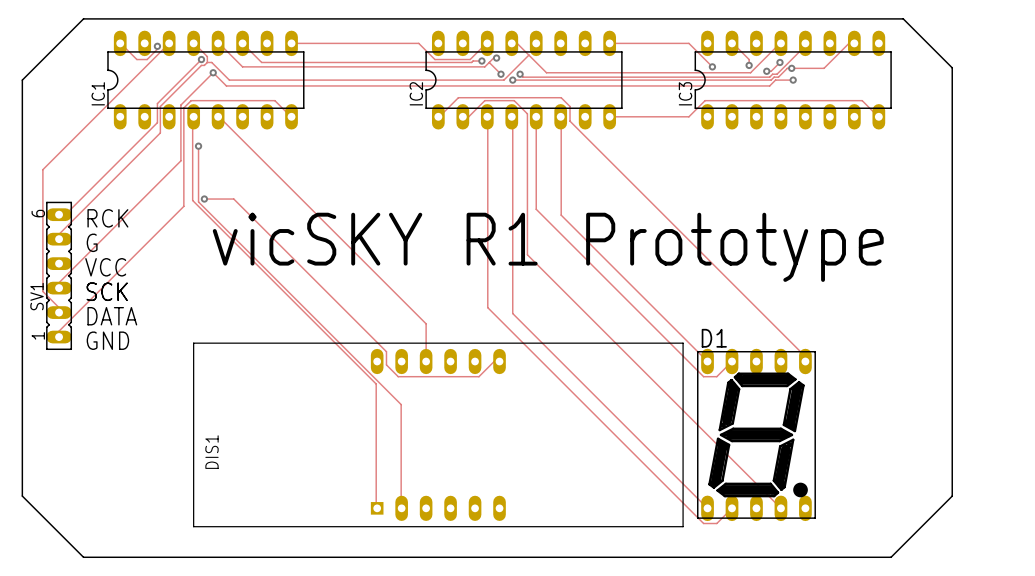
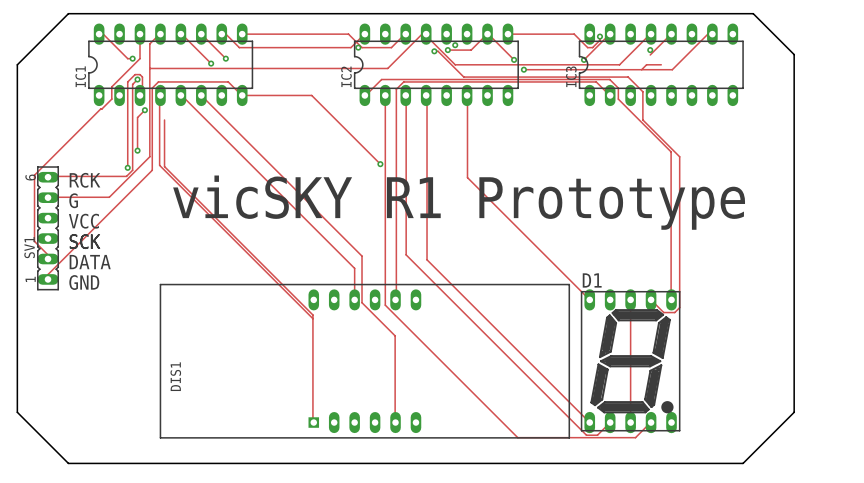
track: (120, 43) (136, 59) (147, 59) (157, 49) (157, 46) -> (99, 34) (103, 34) (127, 58) (132, 58)
track: (169, 43) (42, 169) (42, 212) -> (140, 34) (140, 58) (111, 86) (111, 99) (34, 175)
track: (193, 43) (207, 56) (207, 62) -> (160, 34) (149, 43) (149, 85)
track: none -> (221, 34) (225, 34) (239, 47) (350, 47) (364, 34)
track: none -> (426, 34) (422, 34) (387, 68) (149, 68)
track: (512, 43) (517, 43) (546, 72) (750, 72) -> (619, 64) (625, 58)
track: (732, 43) (749, 59) (749, 65) -> (610, 34) (584, 59)
track: (804, 43) (804, 46) (777, 74) (772, 74) (769, 77) (523, 77) (520, 74) -> (671, 34) (650, 54)
via: (157, 46) -> none
via: none -> (599, 36)
track: (528, 55) (503, 80) (229, 80) (211, 62) (207, 62) -> none
via: none -> (455, 45)
track: (496, 58) (493, 58) (484, 66) (242, 66) -> (211, 63) (201, 53)
via: (496, 58) -> none
track: (201, 59) (157, 103) (157, 122) (66, 213) -> none
via: (201, 59) -> none
via: none -> (358, 47)
track: (705, 59) (712, 66) -> (587, 47) (592, 47) (599, 40) (599, 36)
track: (481, 61) (261, 62) -> (225, 58) (217, 50)
via: (481, 61) -> none
track: (207, 62) (201, 65) (160, 106) -> (137, 79) (132, 86)
track: (489, 62) (501, 74) -> none
track: none -> (447, 50) (471, 50) (488, 34) (514, 59)
via: none -> (447, 50)
track: (779, 62) (771, 71) (766, 71) -> none
track: none -> (434, 51) (438, 51) (463, 77) (628, 77) (642, 91) (642, 119) (679, 156) (679, 307) (674, 312) (663, 312) (651, 299)
via: none -> (434, 51)
via: (749, 65) -> none
via: (712, 66) -> none
via: (791, 68) -> none
track: (824, 68) (787, 68) (778, 77) (774, 77) (771, 80) (743, 80) -> (687, 54) (672, 69) (641, 69)
via: (766, 71) -> none
via: none -> (132, 58)
via: (213, 72) -> none
via: none -> (225, 58)
via: (501, 74) -> none
via: (520, 74) -> none
via: none -> (514, 59)
via: none -> (584, 59)
via: none -> (211, 63)
track: (512, 80) (546, 80) -> (427, 34) (427, 36) (455, 64)
via: (512, 80) -> none
via: (793, 80) -> none
track: (628, 85) (226, 85) (213, 72) (180, 105) -> none
via: none -> (523, 69)
via: none -> (137, 79)
track: (561, 97) (570, 106) (570, 121) (804, 356) -> (467, 79) (609, 79) (618, 88) (618, 99) (671, 151) (671, 295)
track: (514, 100) (527, 113) (527, 254) (780, 508) -> (385, 95) (385, 305) (517, 437) (635, 437) (651, 422)
track: (705, 100) (688, 116) (609, 116) -> (587, 81) (428, 81)
track: (715, 100) (862, 100) (878, 116) -> (596, 81) (610, 95)
track: (476, 109) (468, 116) (462, 116) -> (396, 89) (395, 299)
track: none -> (140, 95) (142, 93) (142, 77) (140, 74) (135, 74) (127, 81) (127, 167)
track: none -> (201, 95) (362, 256) (362, 302) (395, 335) (395, 422)
track: none -> (242, 95) (311, 95) (380, 164)
track: (536, 116) (536, 209) (703, 376) (716, 376) (732, 361) -> none
track: (160, 132) (59, 234) (59, 238) -> (132, 108) (132, 170) (126, 176) (54, 176)
track: none -> (144, 110) (137, 117) (137, 150)
via: none -> (144, 110)
via: (198, 146) -> none
track: (180, 160) (59, 282) (59, 288) -> (149, 132) (149, 156) (109, 197) (48, 197)
via: none -> (137, 150)
track: (204, 199) (233, 199) (386, 351) (386, 364) (398, 376) (478, 376) (493, 362) (499, 361) -> none
via: (204, 199) -> none
via: none -> (380, 164)
via: none -> (127, 167)
track: none -> (630, 299) (630, 422)
track: (376, 379) (401, 404) (401, 508) -> (312, 315) (312, 318)

